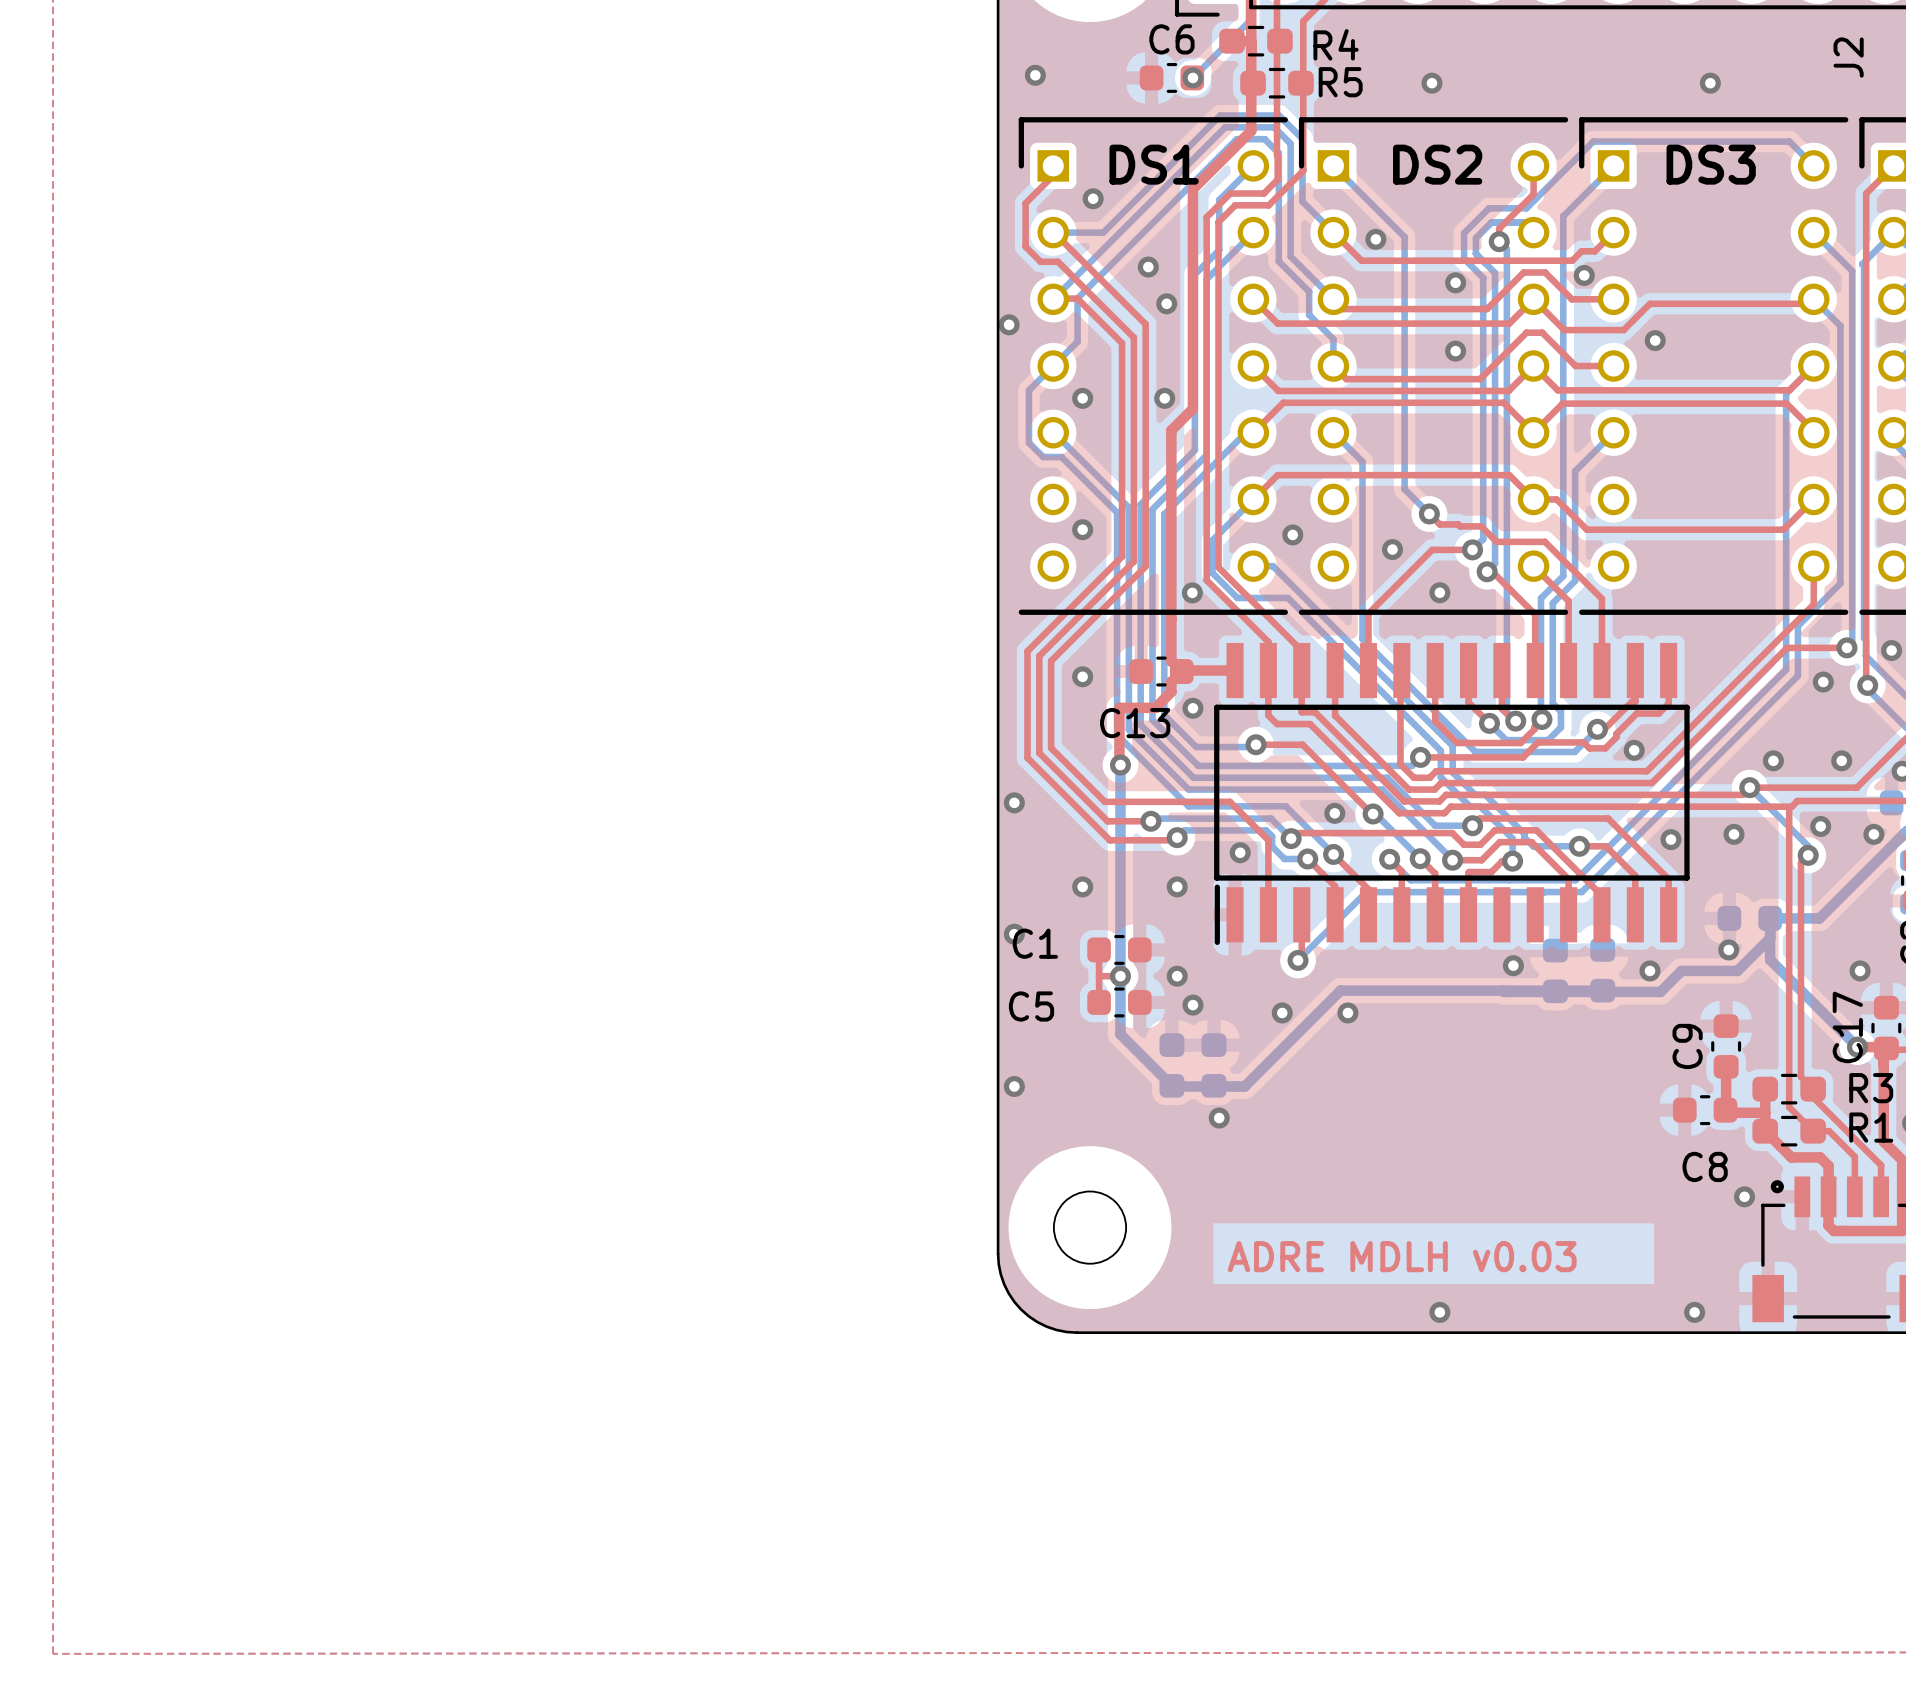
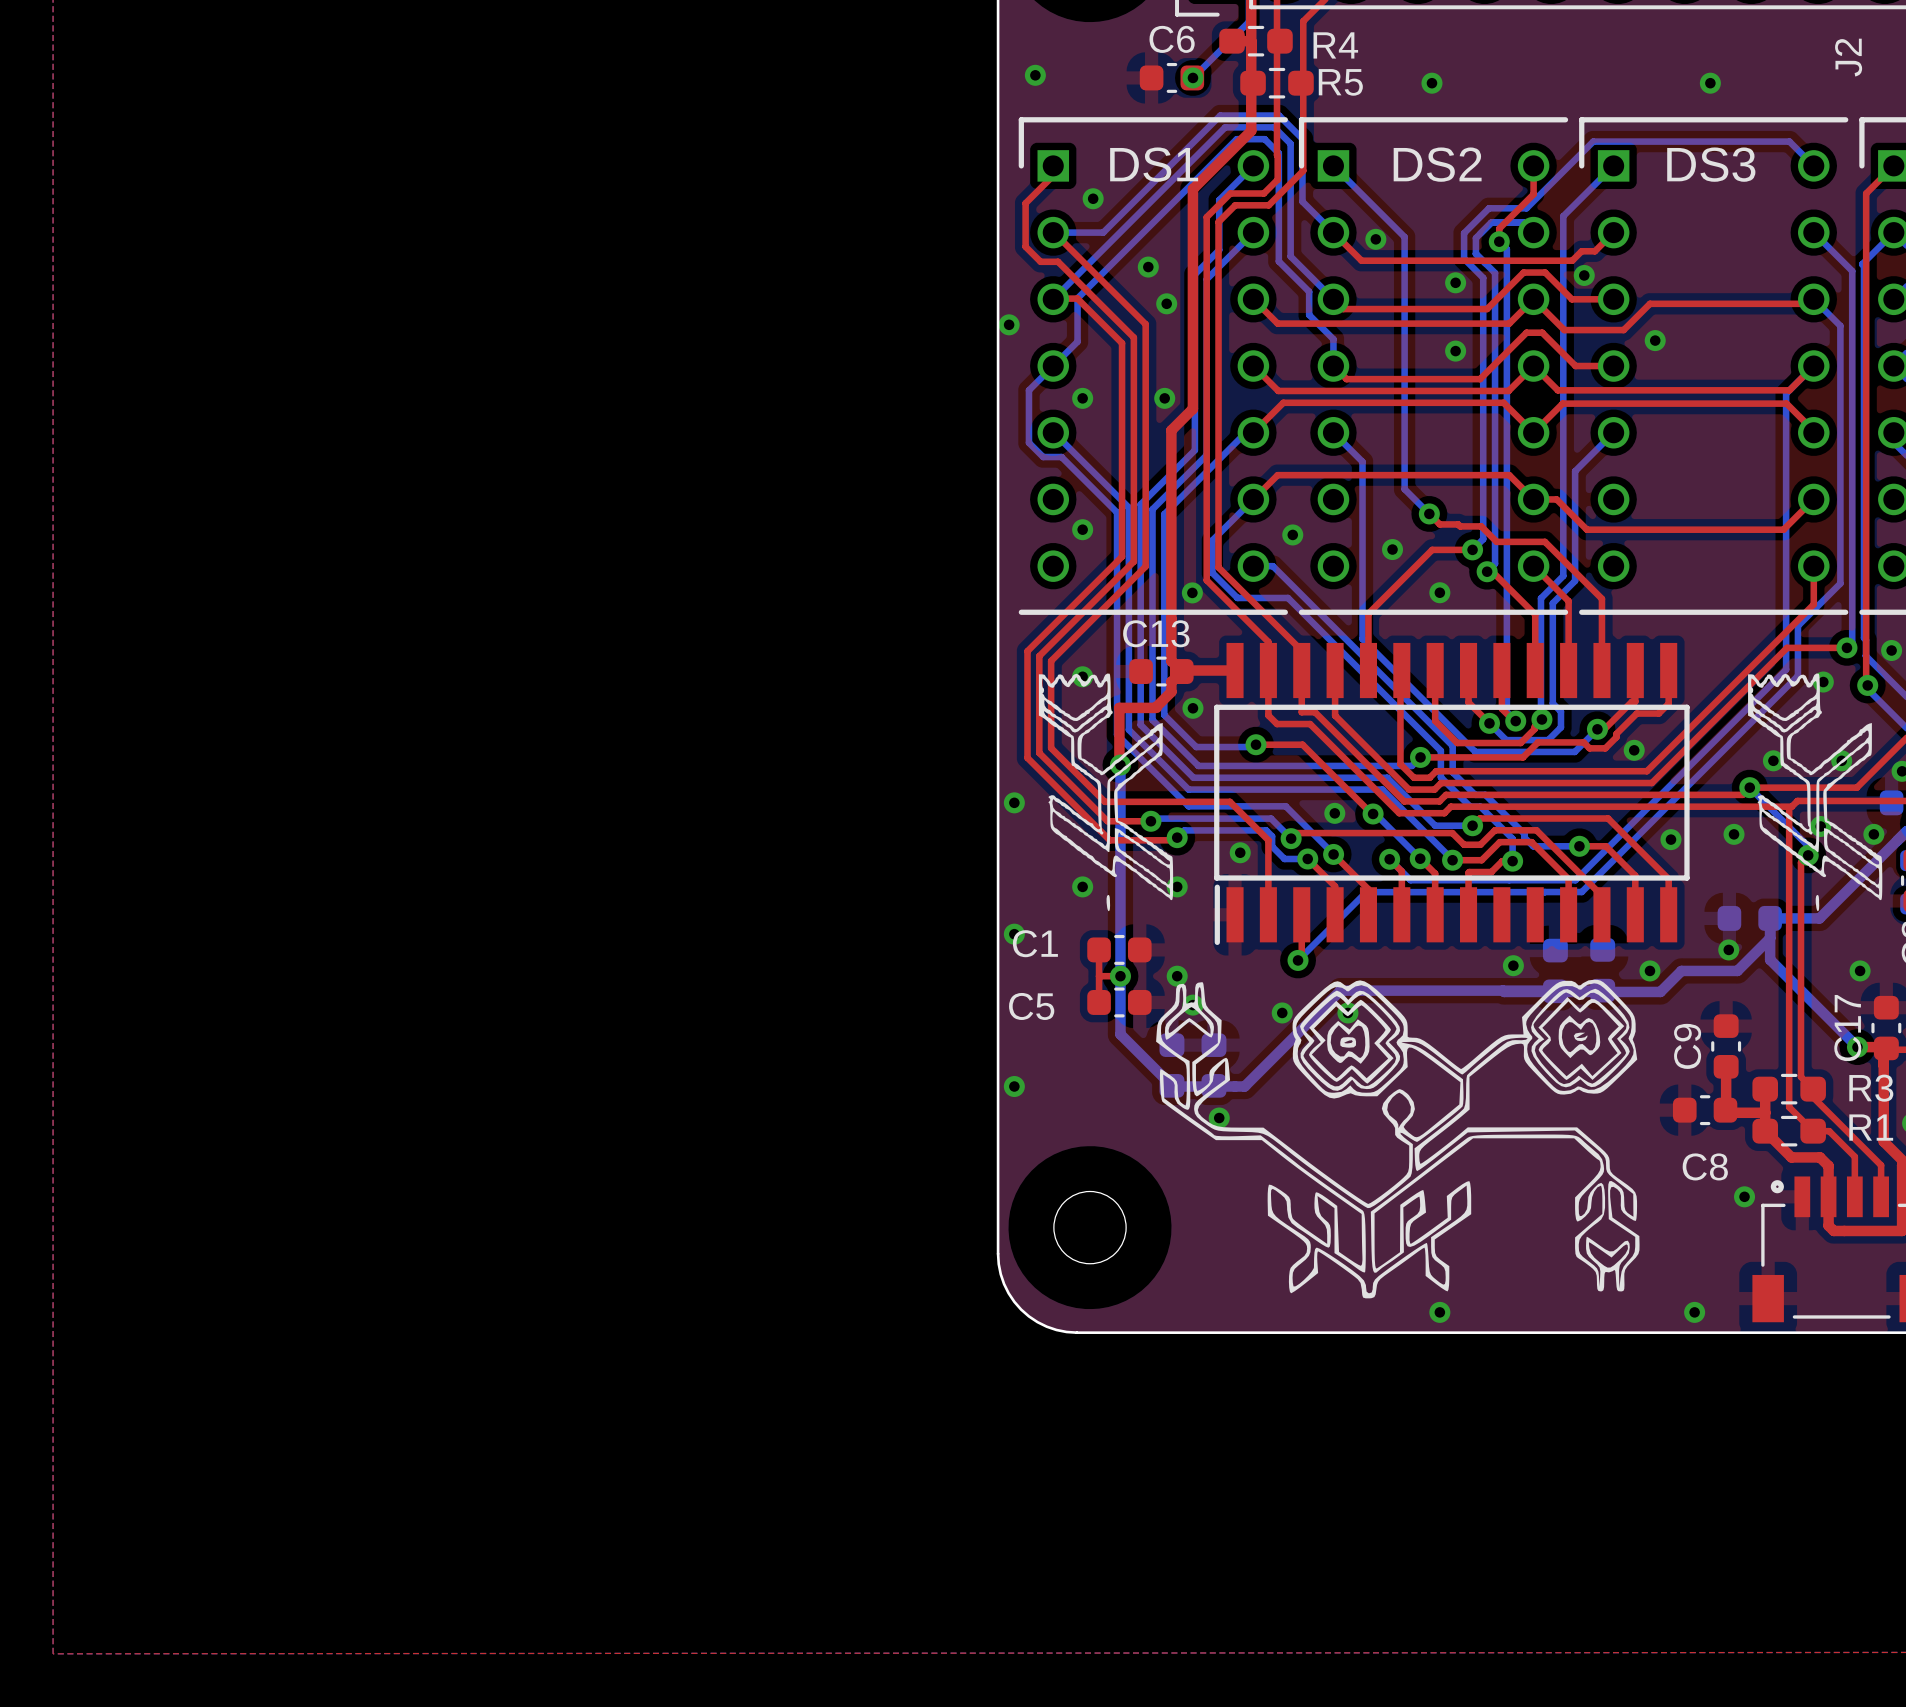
drawing: none -> [1038, 673, 1174, 912]
drawing: none -> [1748, 673, 1883, 912]
C13 name position: C13 (1135, 723) -> C13 (1156, 633)
drawing: none -> [1156, 979, 1640, 1299]
text: ADRE MDLH v0.03 (1402, 1256) -> none

